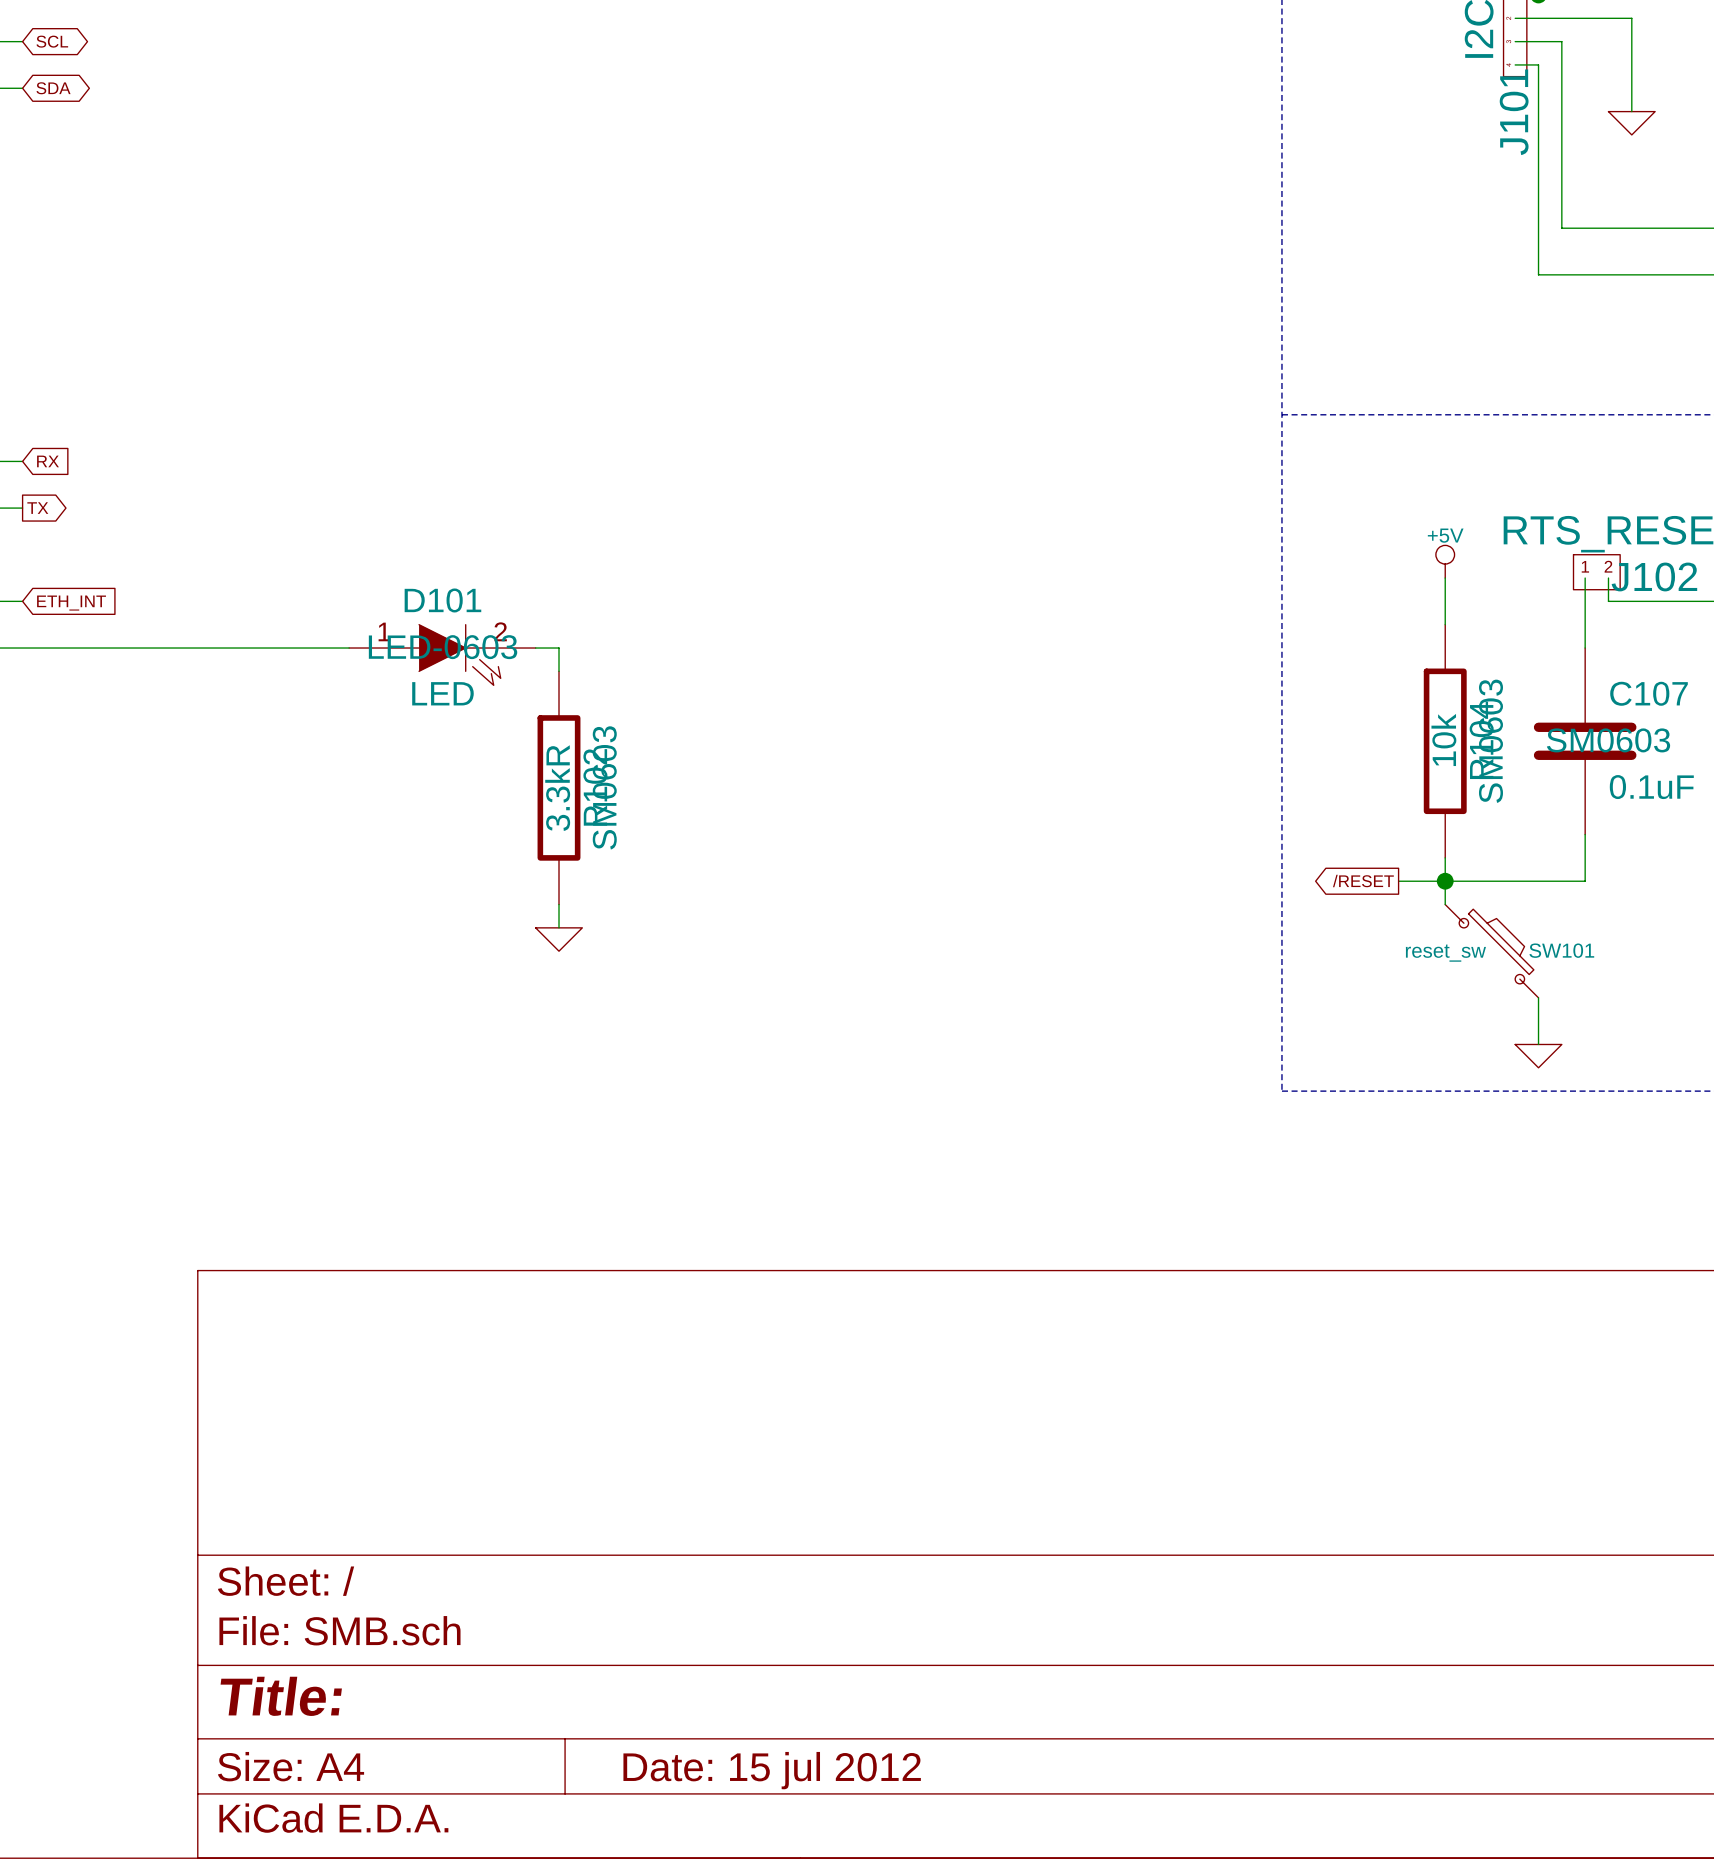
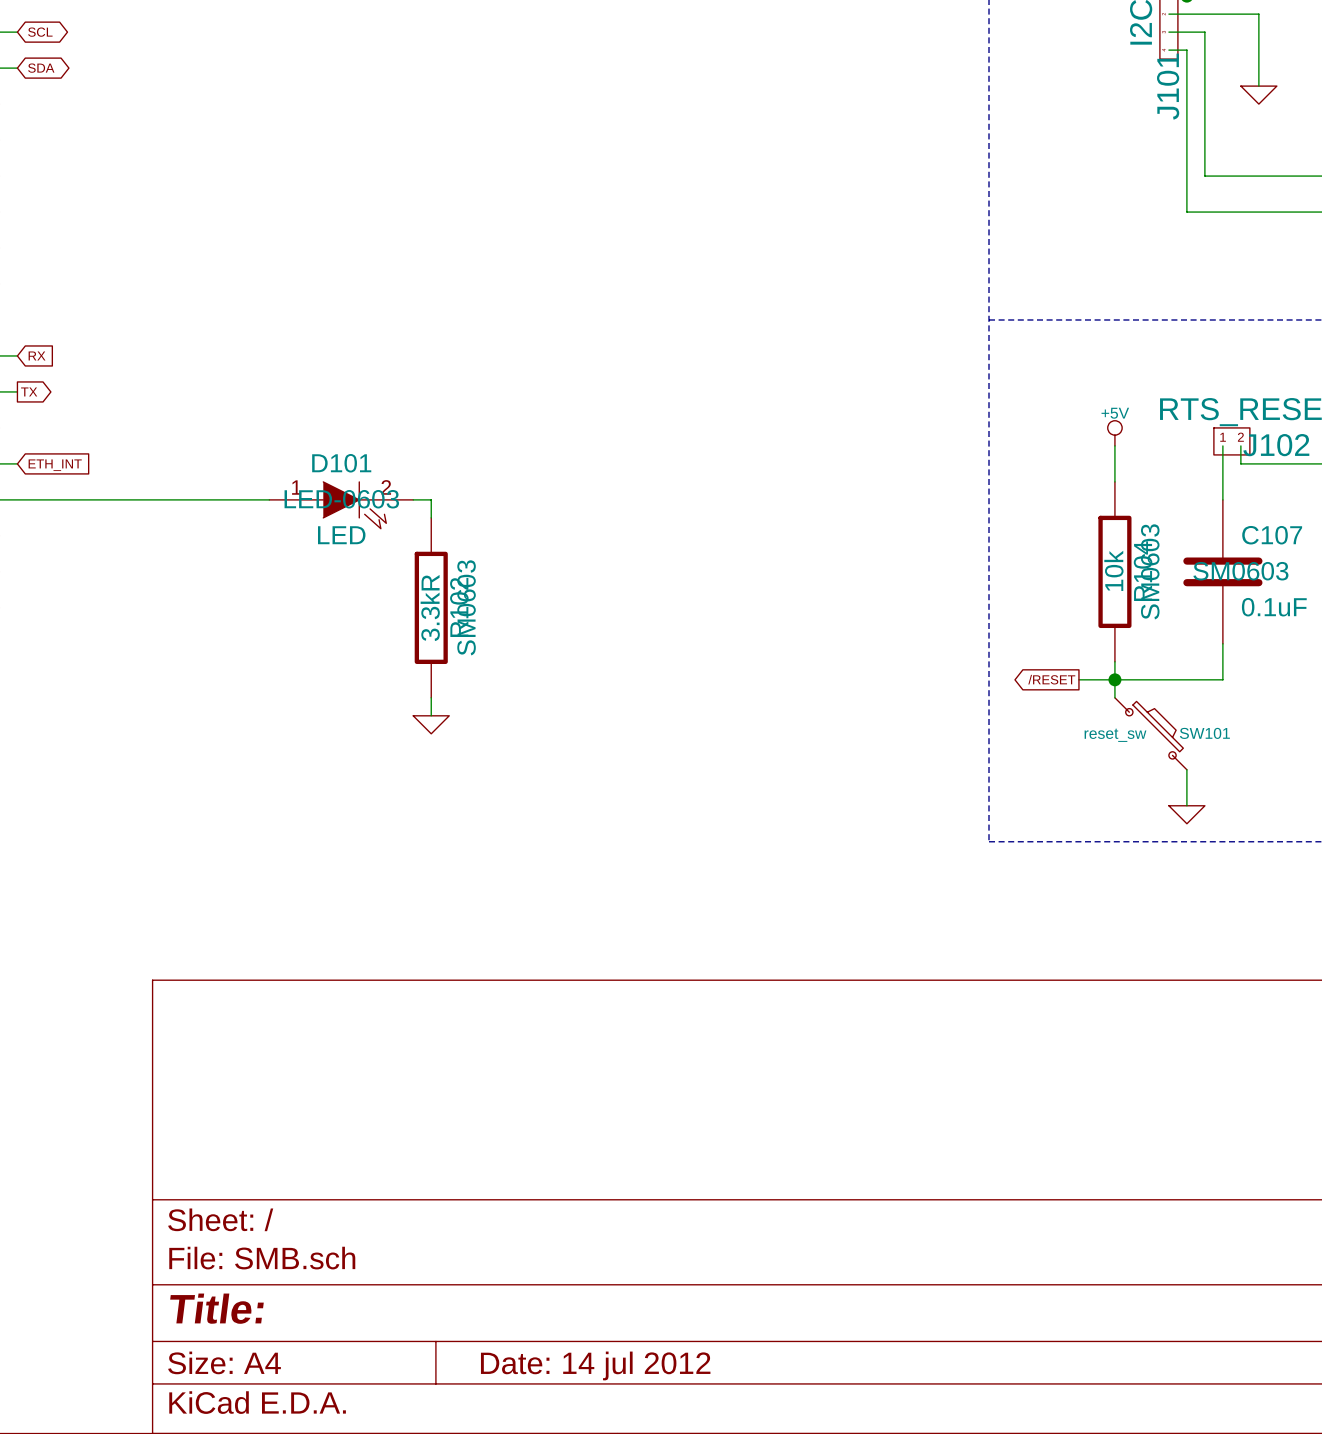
title block: Date: 15 jul 2012 (772, 1770) -> Date: 14 jul 2012 (595, 1365)

